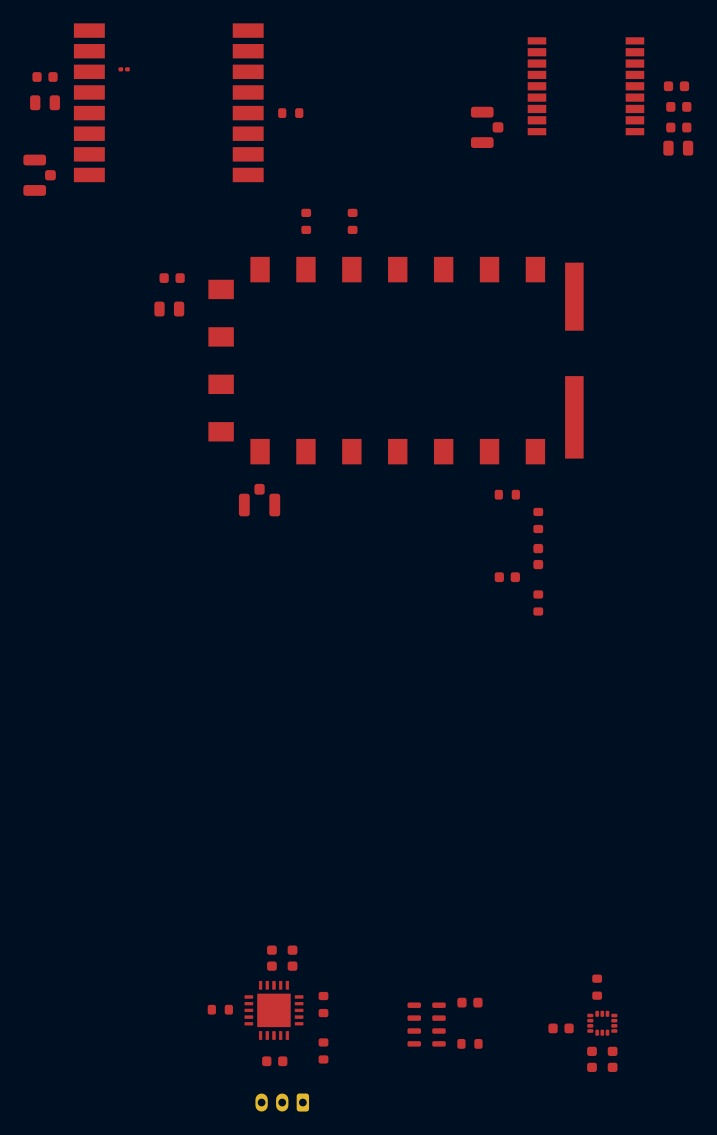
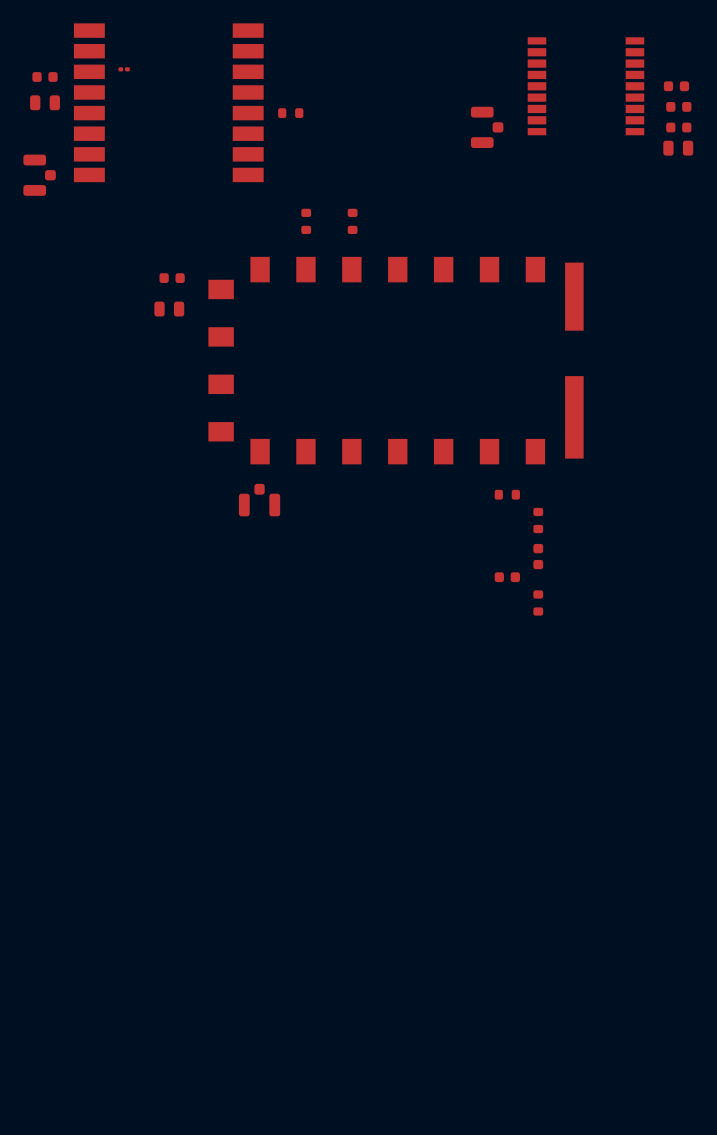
part: (271, 958) -> none
part: (292, 958) -> none
part: (597, 987) -> none
part: (469, 1002) -> none
part: (323, 1004) -> none
part: (220, 1009) -> none
part: (273, 1010) -> none
part: (602, 1023) -> none
part: (426, 1024) -> none
part: (561, 1028) -> none
part: (469, 1043) -> none
part: (323, 1050) -> none
part: (592, 1059) -> none
part: (612, 1059) -> none
part: (274, 1061) -> none
part: (282, 1102) -> none

